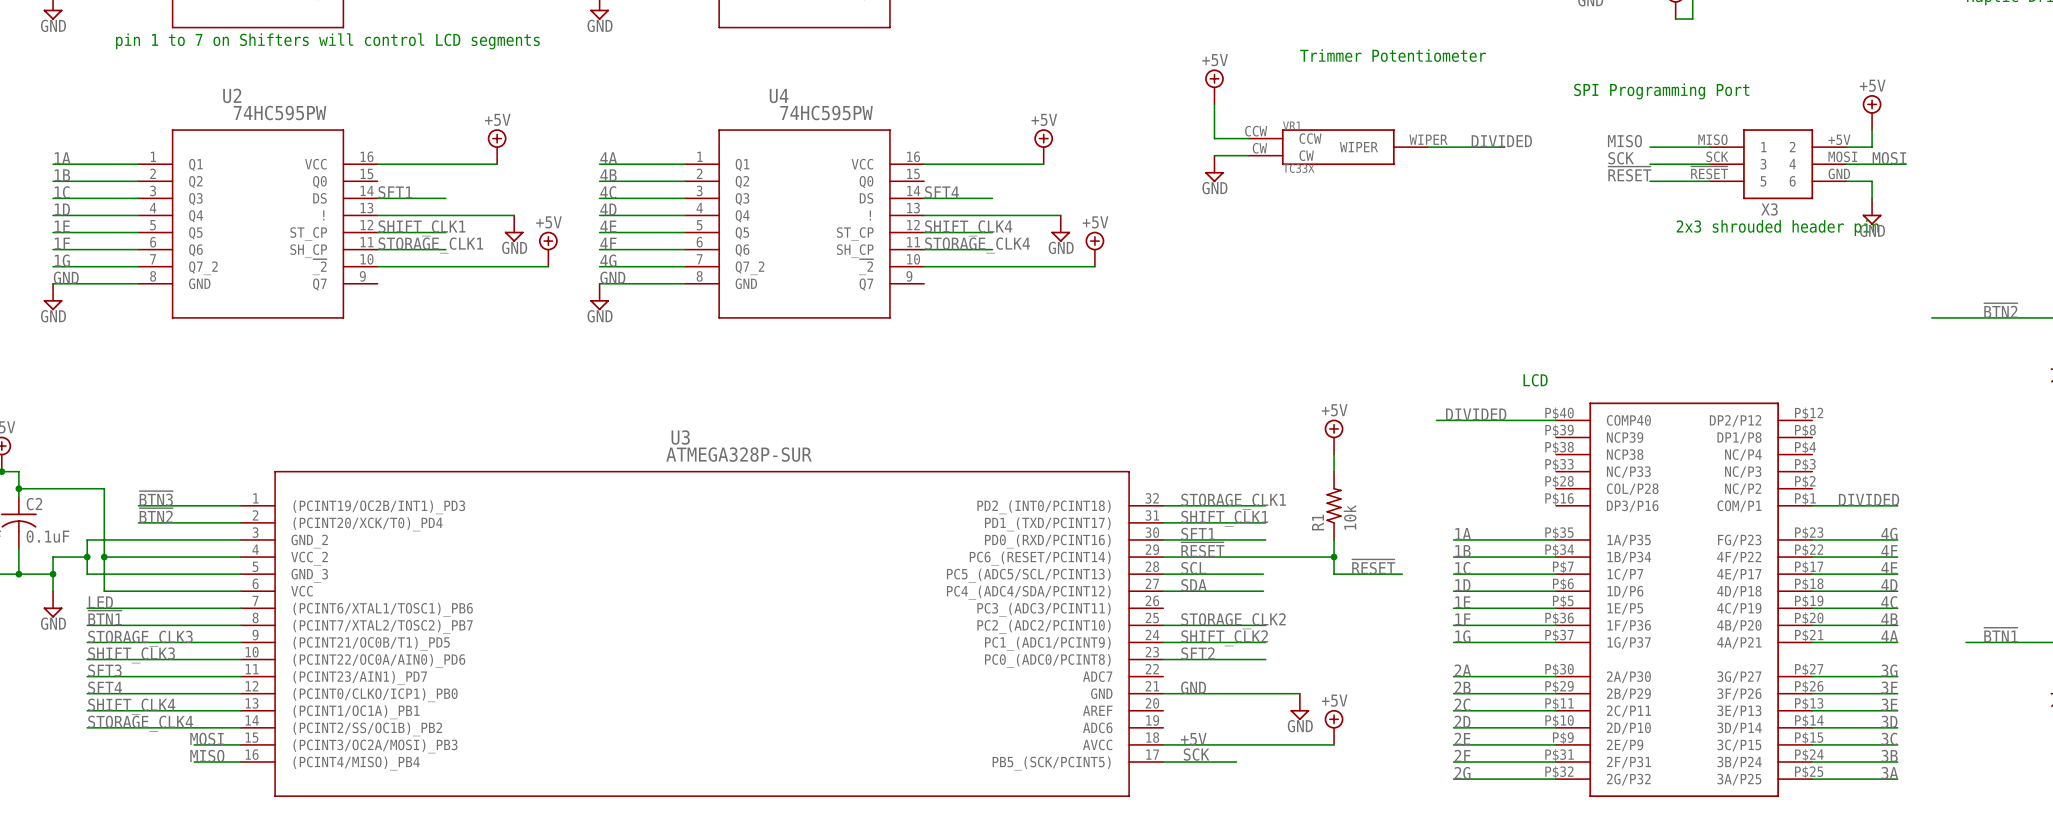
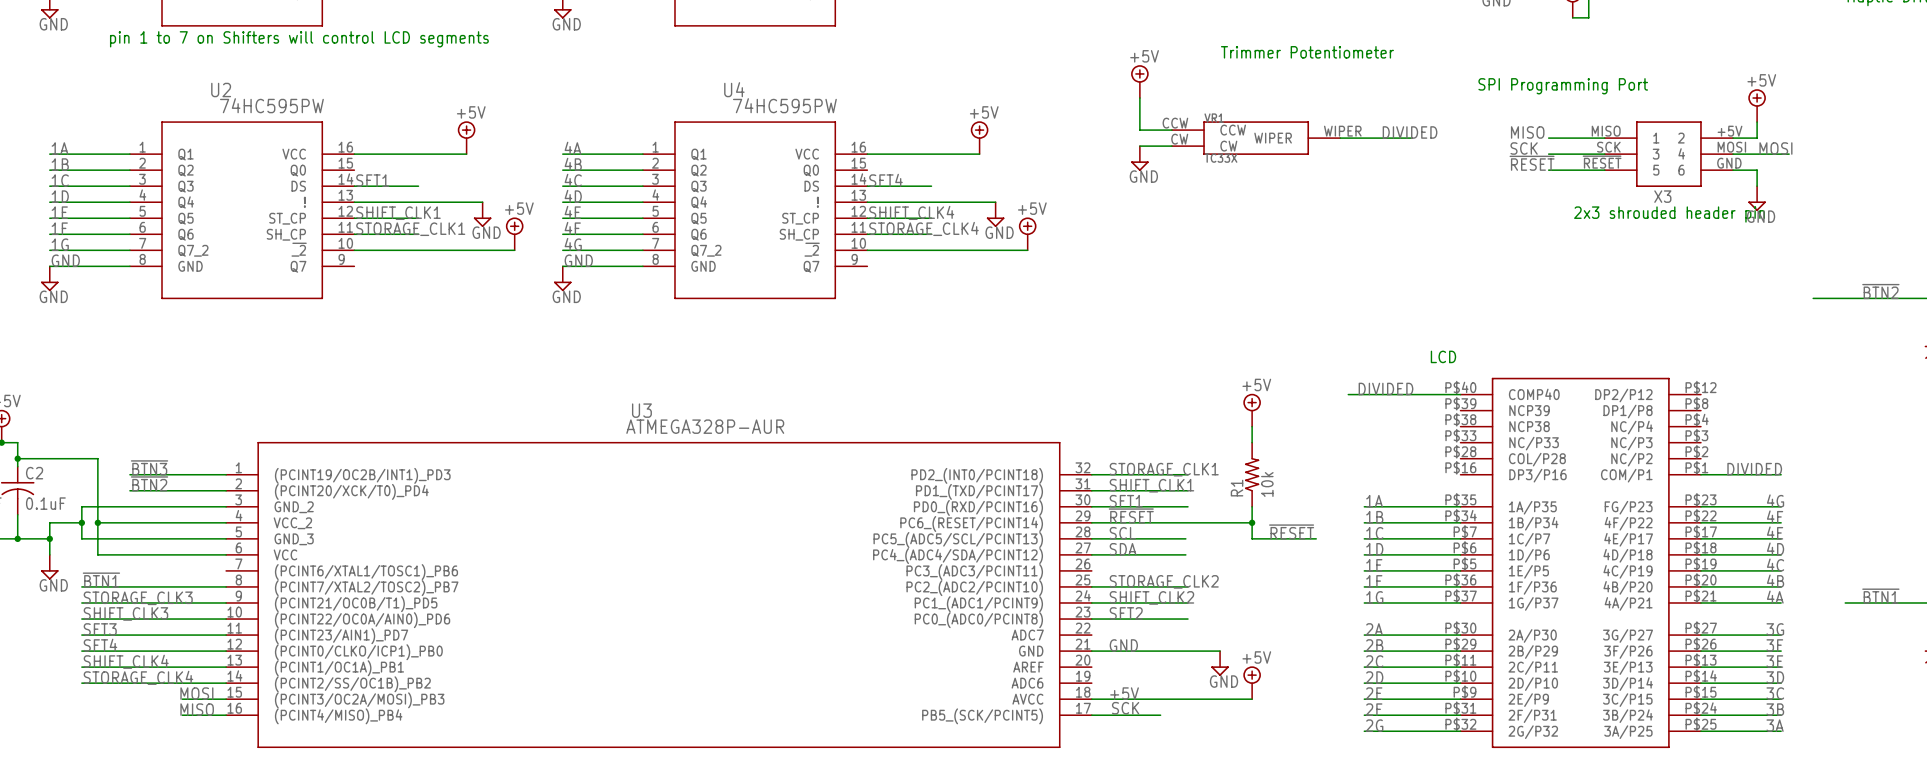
U3 value: ATMEGA328P-SUR (739, 454) -> ATMEGA328P-AUR (705, 426)
label: LED (100, 602) -> none
wire: (87, 608) (240, 608) -> none

